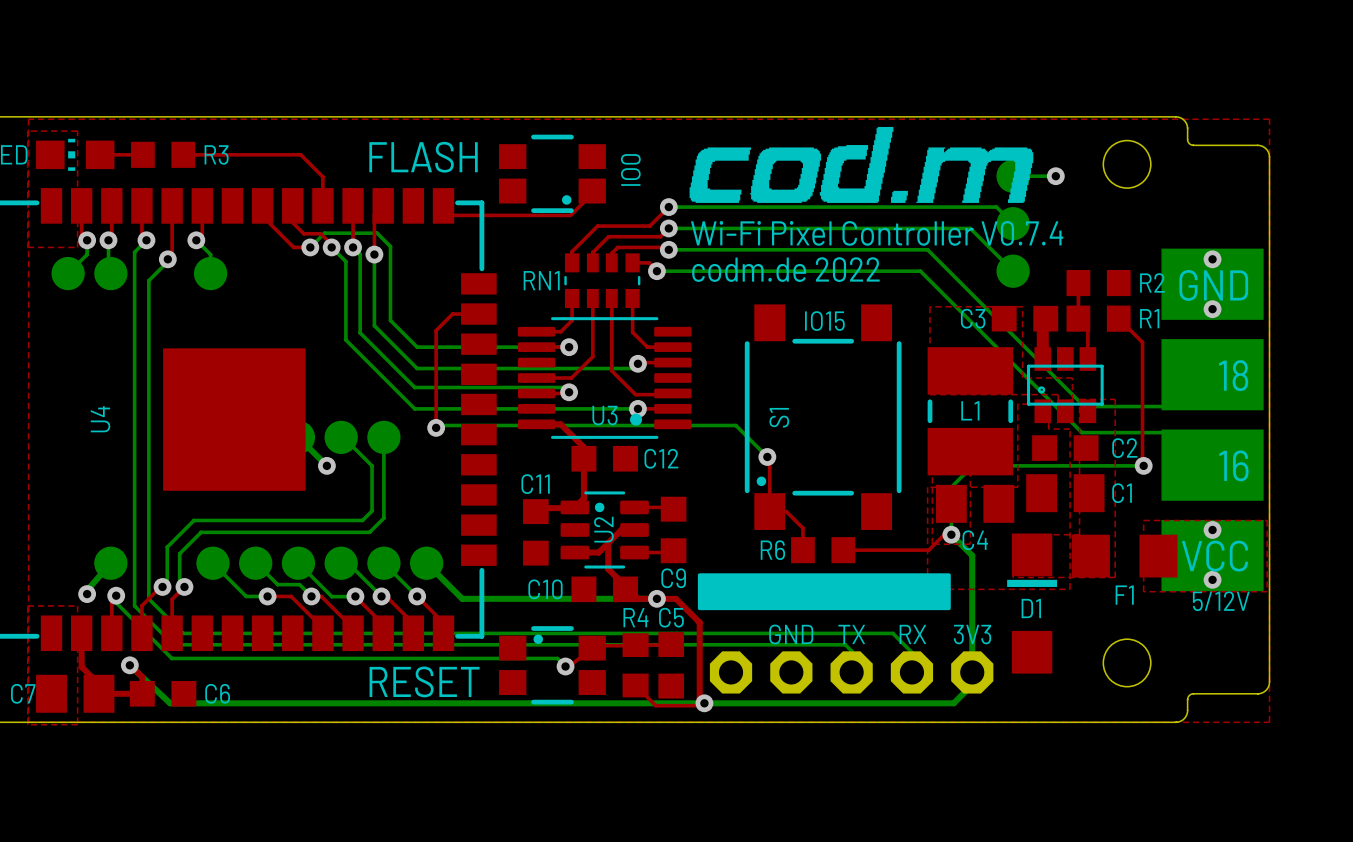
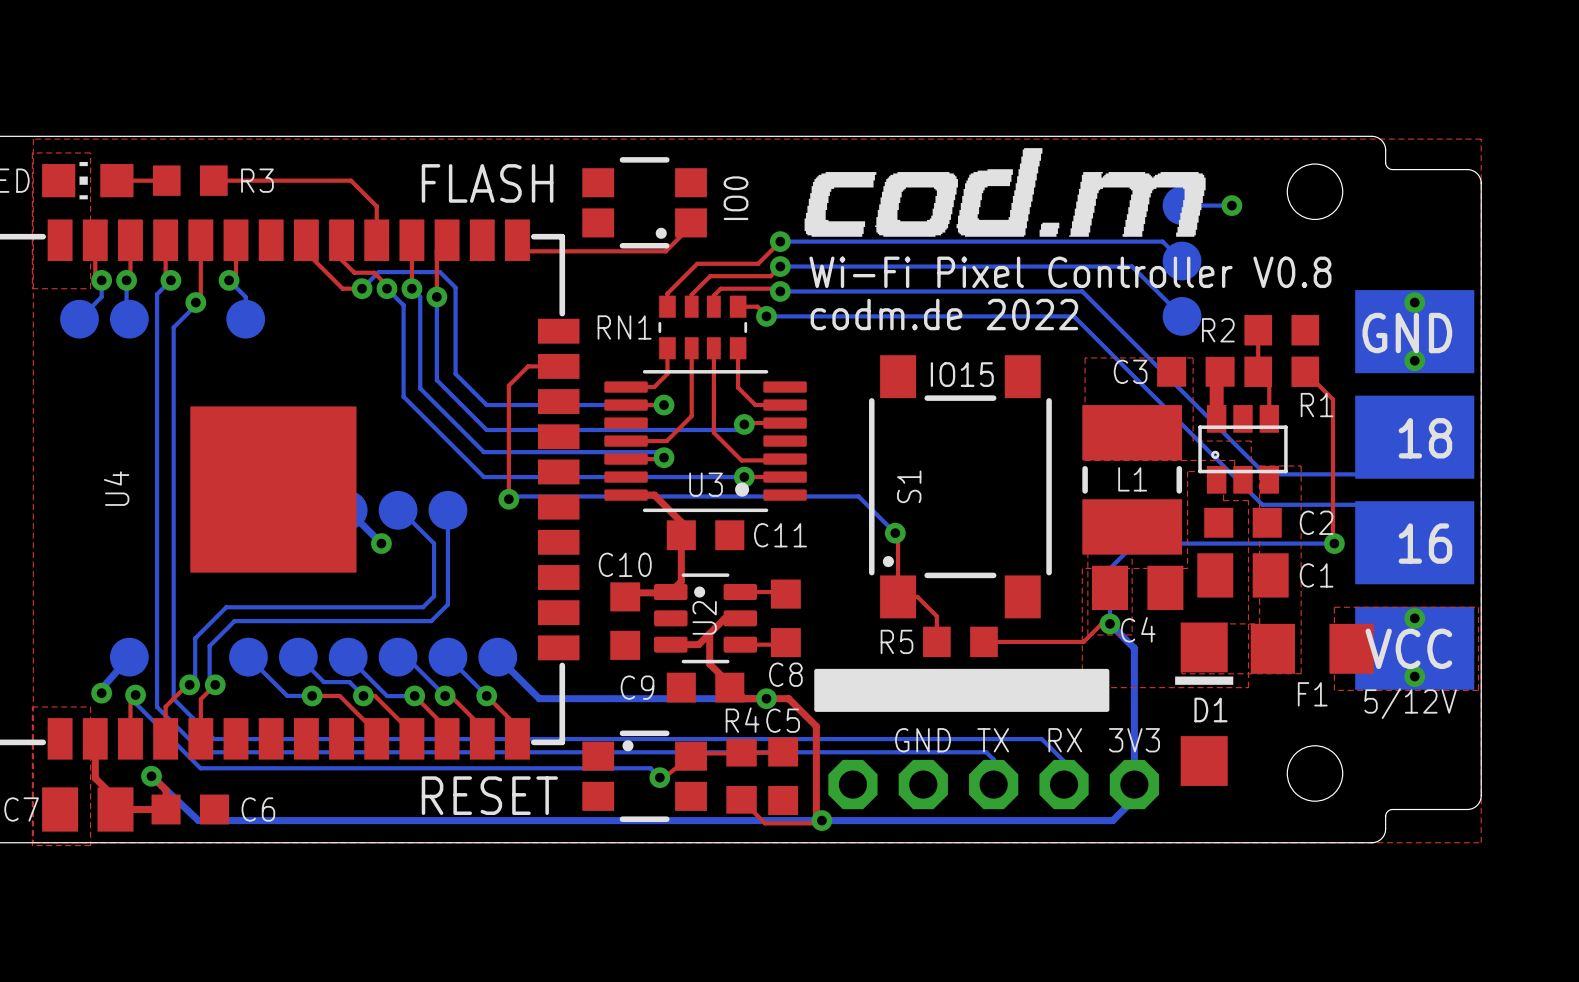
text: Wi-Fi Pixel Controller V0.7.4 (877, 233) -> Wi-Fi Pixel Controller V0.8 (1070, 272)
R2 name position: R2 (1152, 282) -> R2 (1218, 330)
R1 name position: R1 (1149, 318) -> R1 (1317, 405)
C12 name: C12 (661, 458) -> C11 (780, 535)
C11 name: C11 (535, 484) -> C10 (625, 564)
R6 name: R6 (772, 550) -> R5 (897, 641)
C9 name: C9 (673, 578) -> C8 (785, 674)
C10 name: C10 (545, 589) -> C9 (637, 687)

